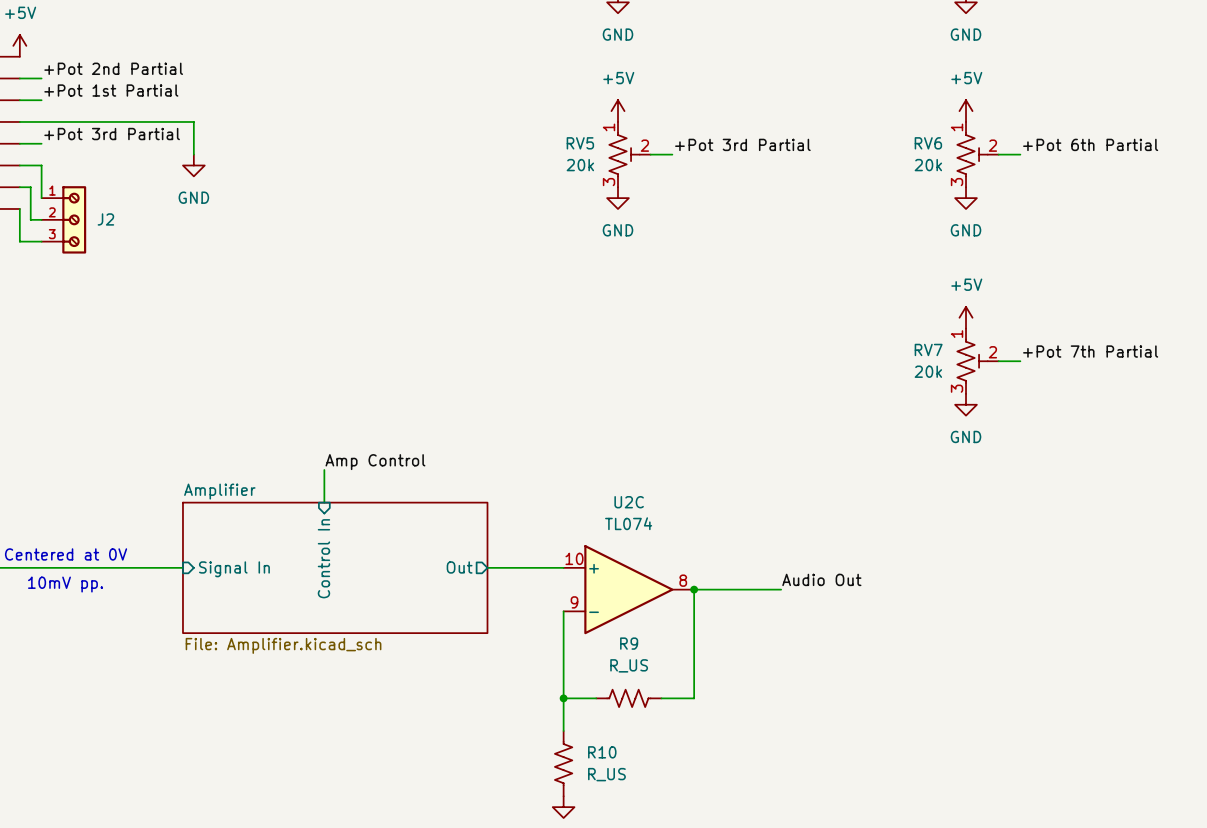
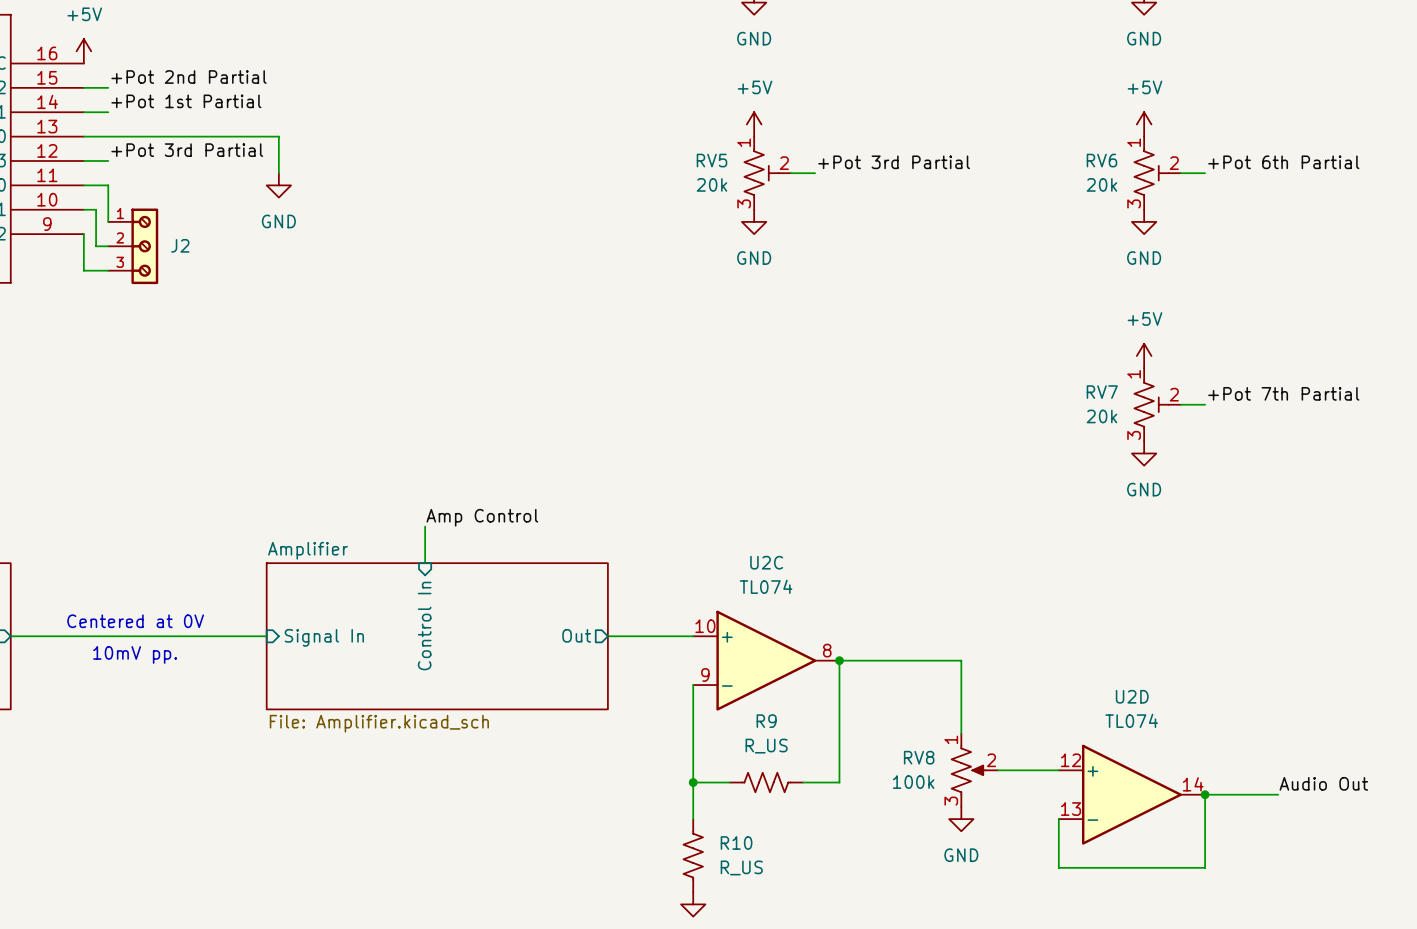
label: Audio Out (821, 579) -> none
wire: none -> (936, 660) (961, 660) (961, 733)
RV8: none -> 100k (974, 770)
wire: none -> (997, 770) (1058, 770)
label: none -> Audio Out (1323, 783)
U2D: none -> TL074 (1131, 794)
junction: none -> (1205, 794)
wire: none -> (1278, 794) (1205, 794) (1205, 867) (1058, 867) (1058, 819)
power symbol: none -> GND (961, 819)

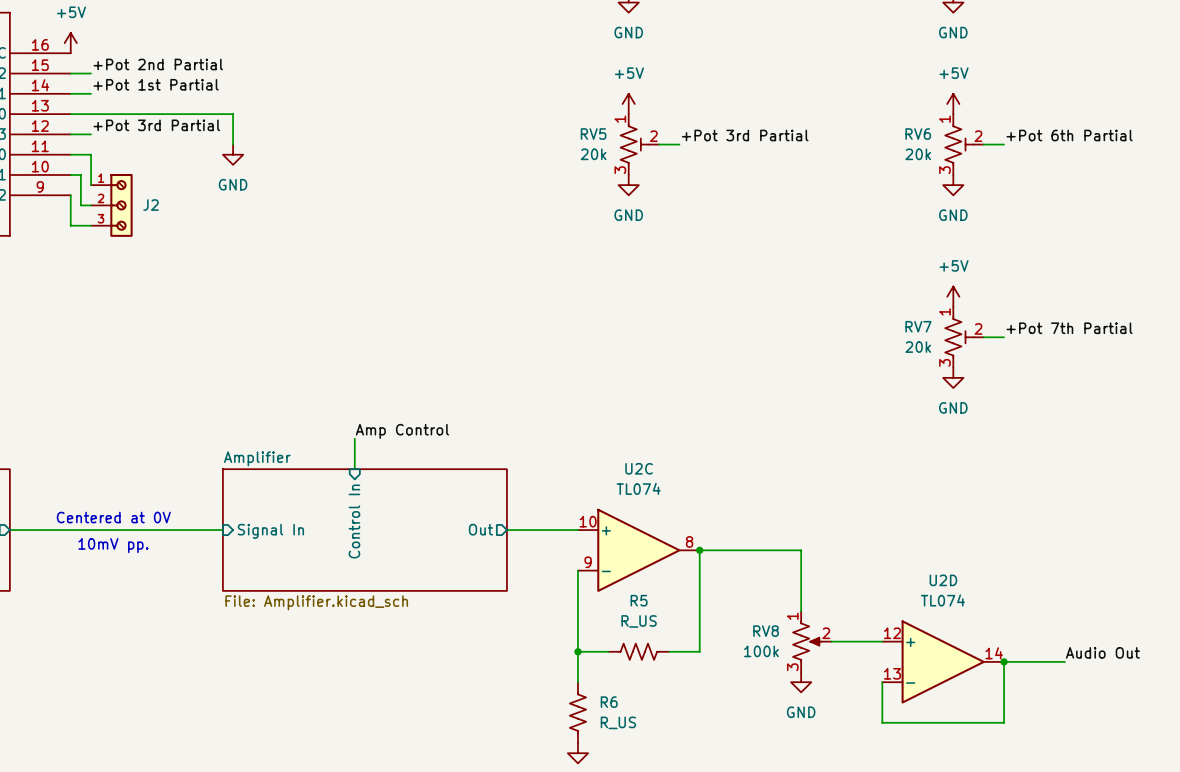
R9 name: R9 (766, 721) -> R5 (639, 600)
R10 name: R10 (736, 843) -> R6 (609, 702)

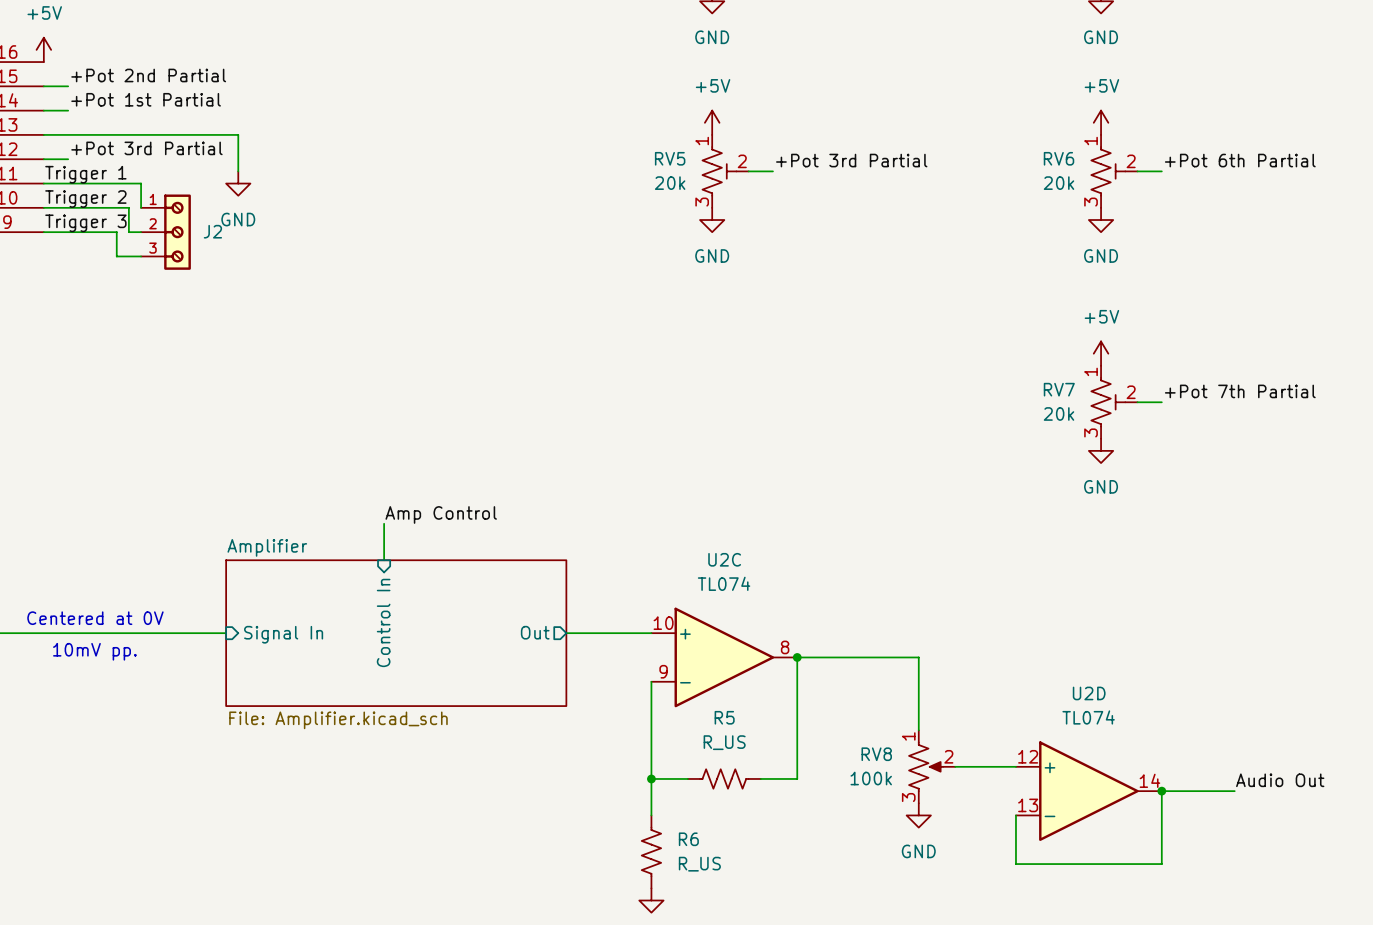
label: none -> Trigger 1 (85, 174)
wire: (91, 154) (91, 185) -> (68, 183) (141, 183) (141, 207)
label: none -> Trigger 2 (85, 199)
wire: (80, 174) (80, 205) (91, 205) -> (56, 207) (128, 207) (128, 232) (141, 232)
label: none -> Trigger 3 (85, 223)
wire: (70, 195) (70, 225) (91, 225) -> (43, 232) (116, 232) (116, 256) (141, 256)
J2 position: (111, 205) -> (165, 232)

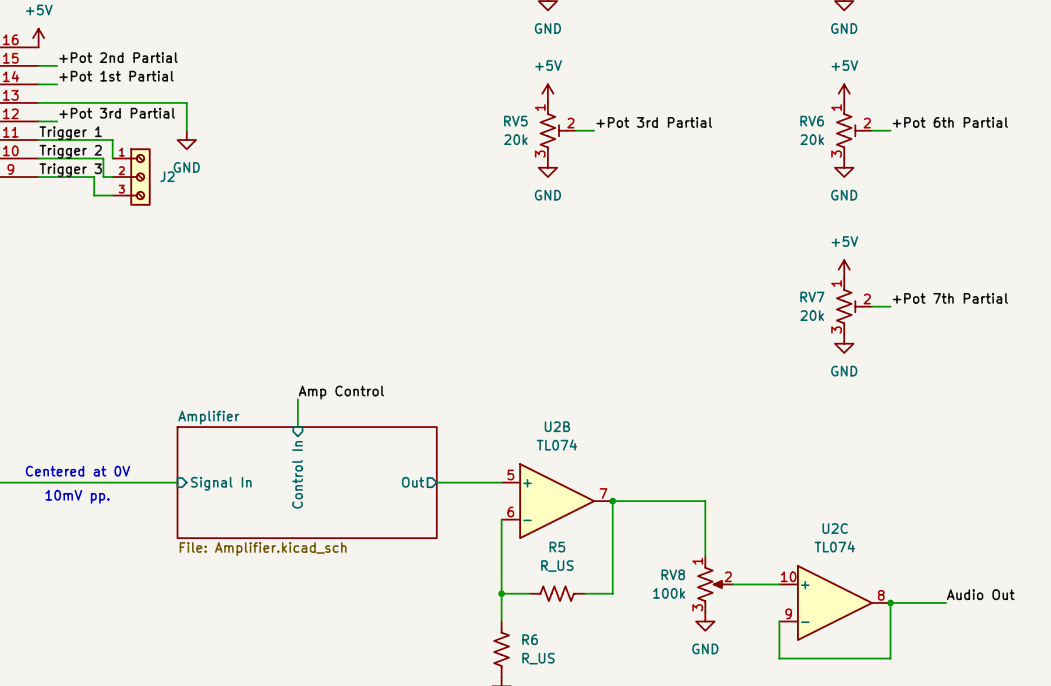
U2C position: (724, 657) -> (834, 602)
U2B: none -> TL074 (557, 501)
U2D: TL074 (1088, 791) -> none

